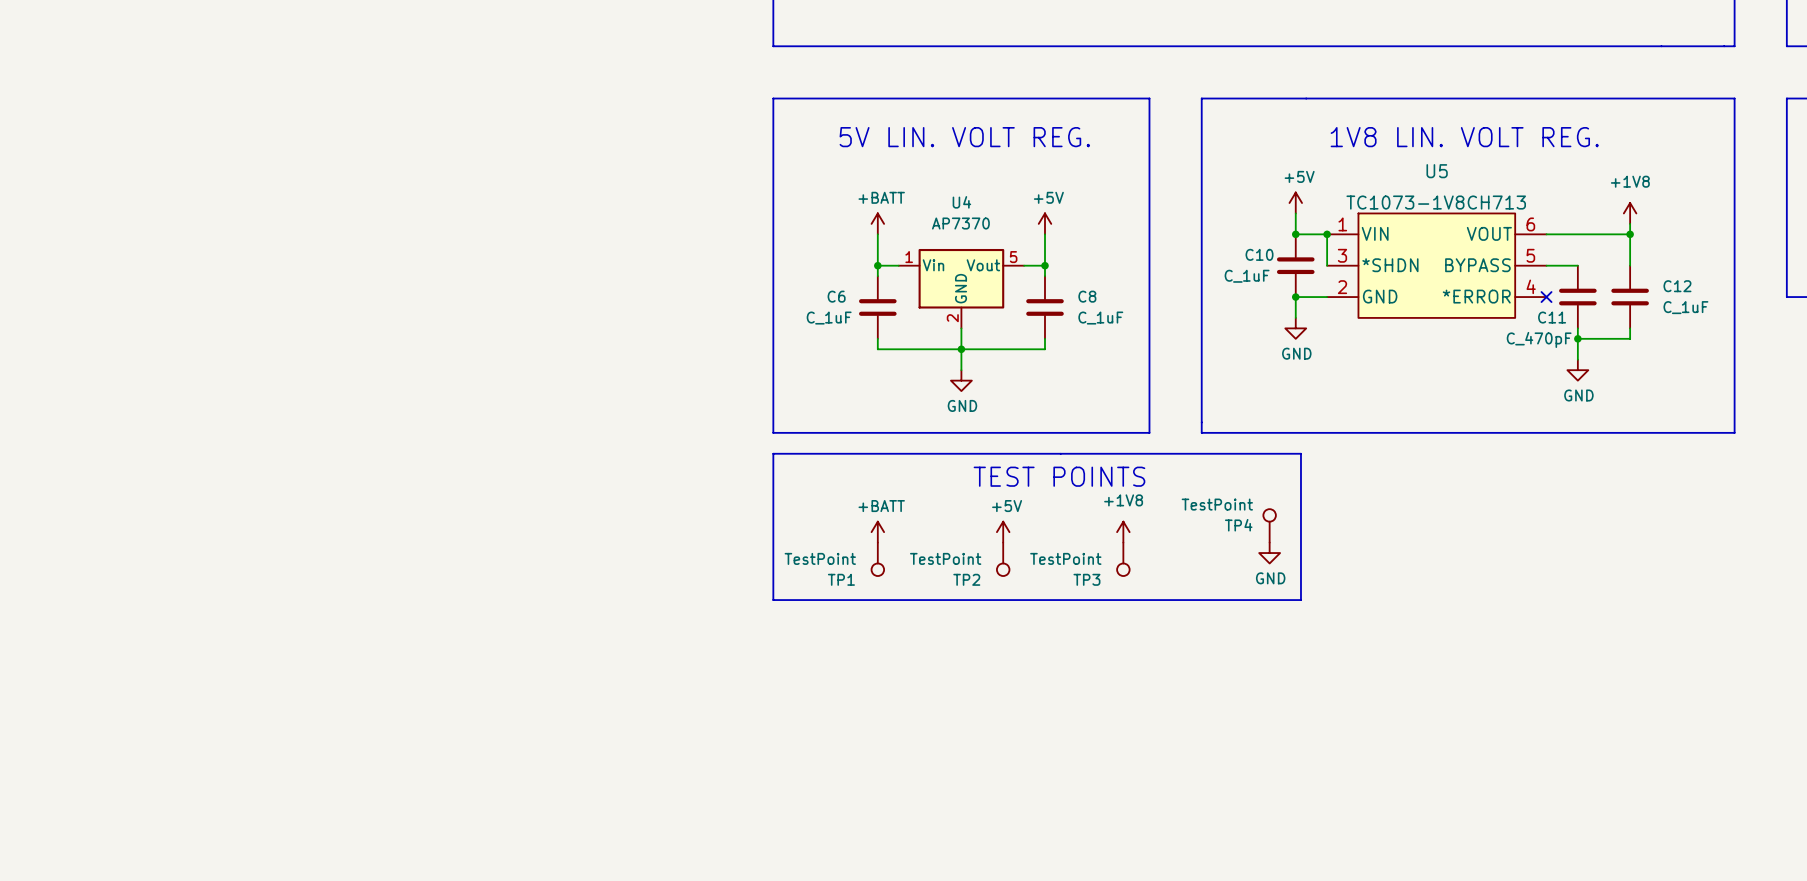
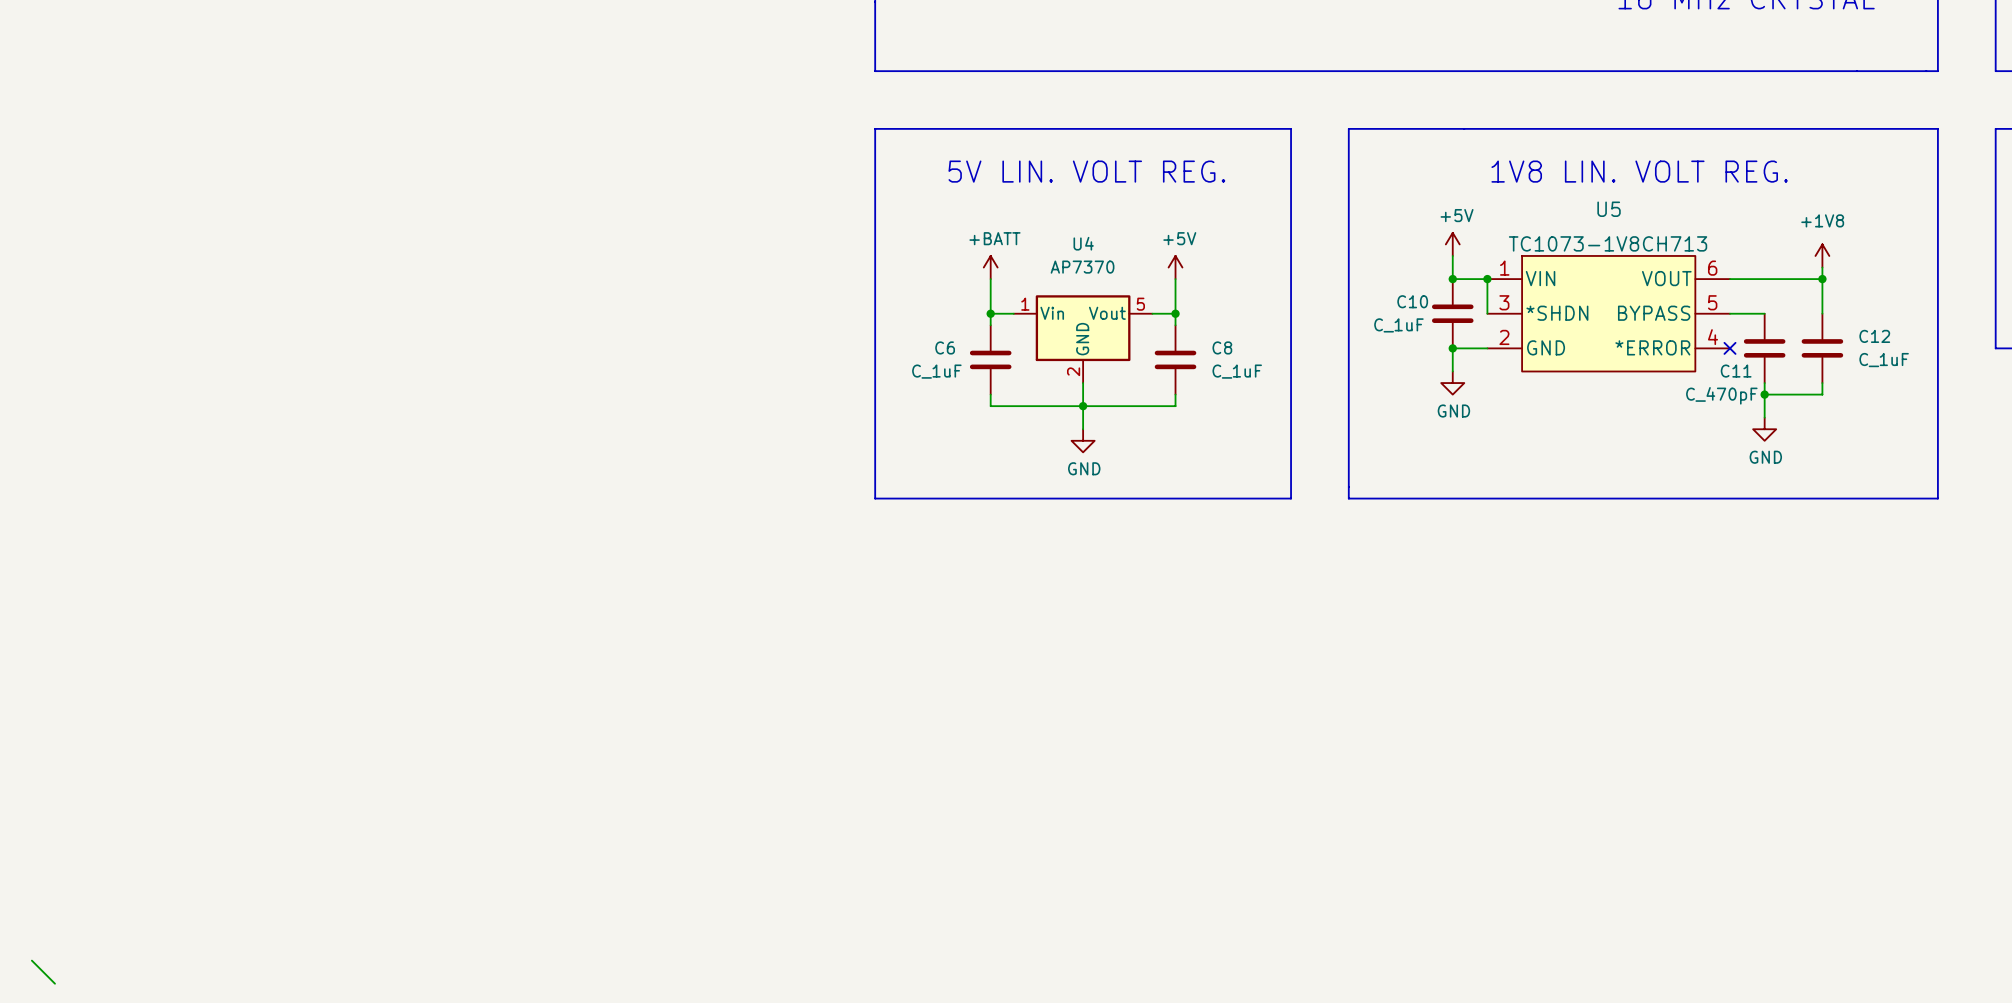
line: (773, 453) (773, 600) (1300, 600) (1300, 453) (773, 453) -> none
text: TEST POINTS (1059, 476) -> none
TP4: TestPoint (1269, 525) -> none
power symbol: +BATT (877, 532) -> none
power symbol: +5V (1003, 532) -> none
power symbol: +1V8 (1123, 532) -> none
power symbol: GND (1269, 553) -> none
TP1: TestPoint (877, 559) -> none
TP2: TestPoint (1003, 559) -> none
TP3: TestPoint (1123, 559) -> none
wire: none -> (31, 960) (55, 983)

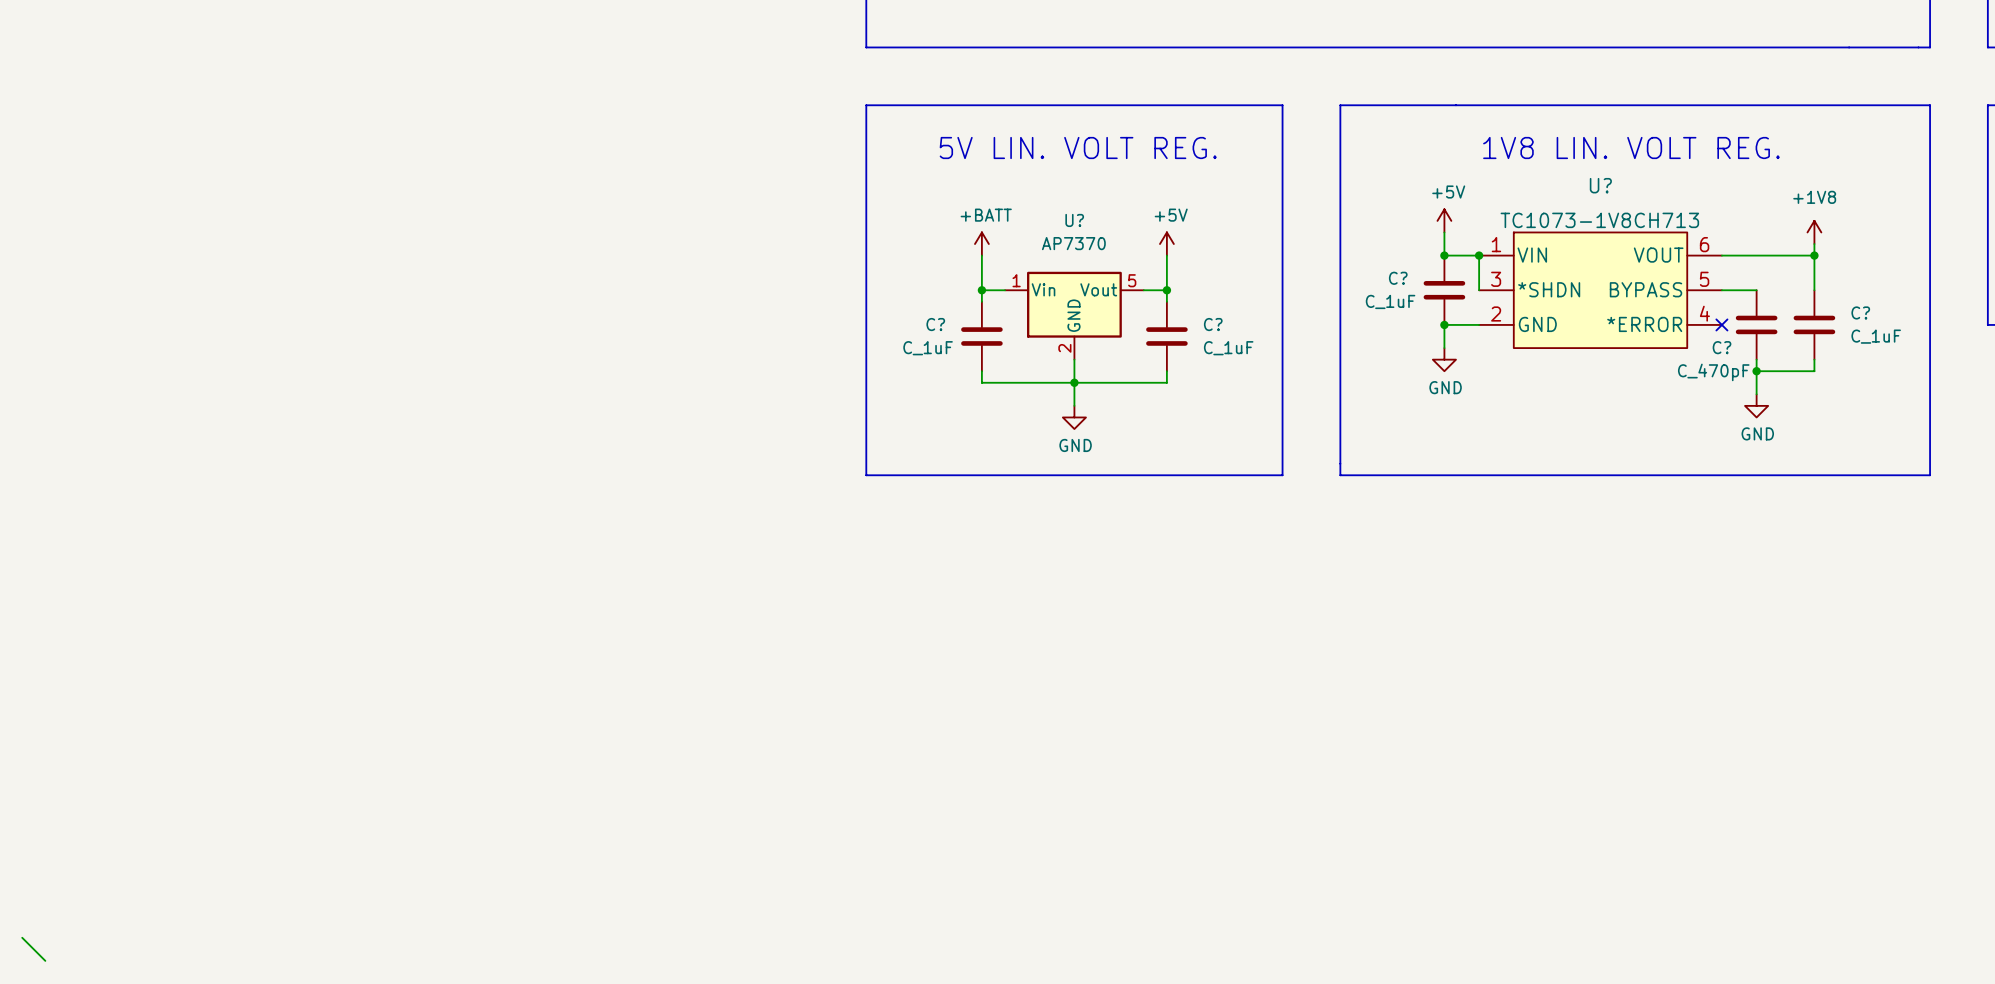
U5 name: U5 (1609, 209) -> U? (1600, 185)
U4 name: U4 (1083, 243) -> U? (1074, 220)
C10 name: C10 (1412, 301) -> C? (1398, 278)
C12 name: C12 (1874, 336) -> C? (1860, 312)
C6 name: C6 (945, 347) -> C? (935, 324)
C8 name: C8 (1222, 347) -> C? (1213, 324)
C11 name: C11 (1736, 371) -> C? (1722, 347)

